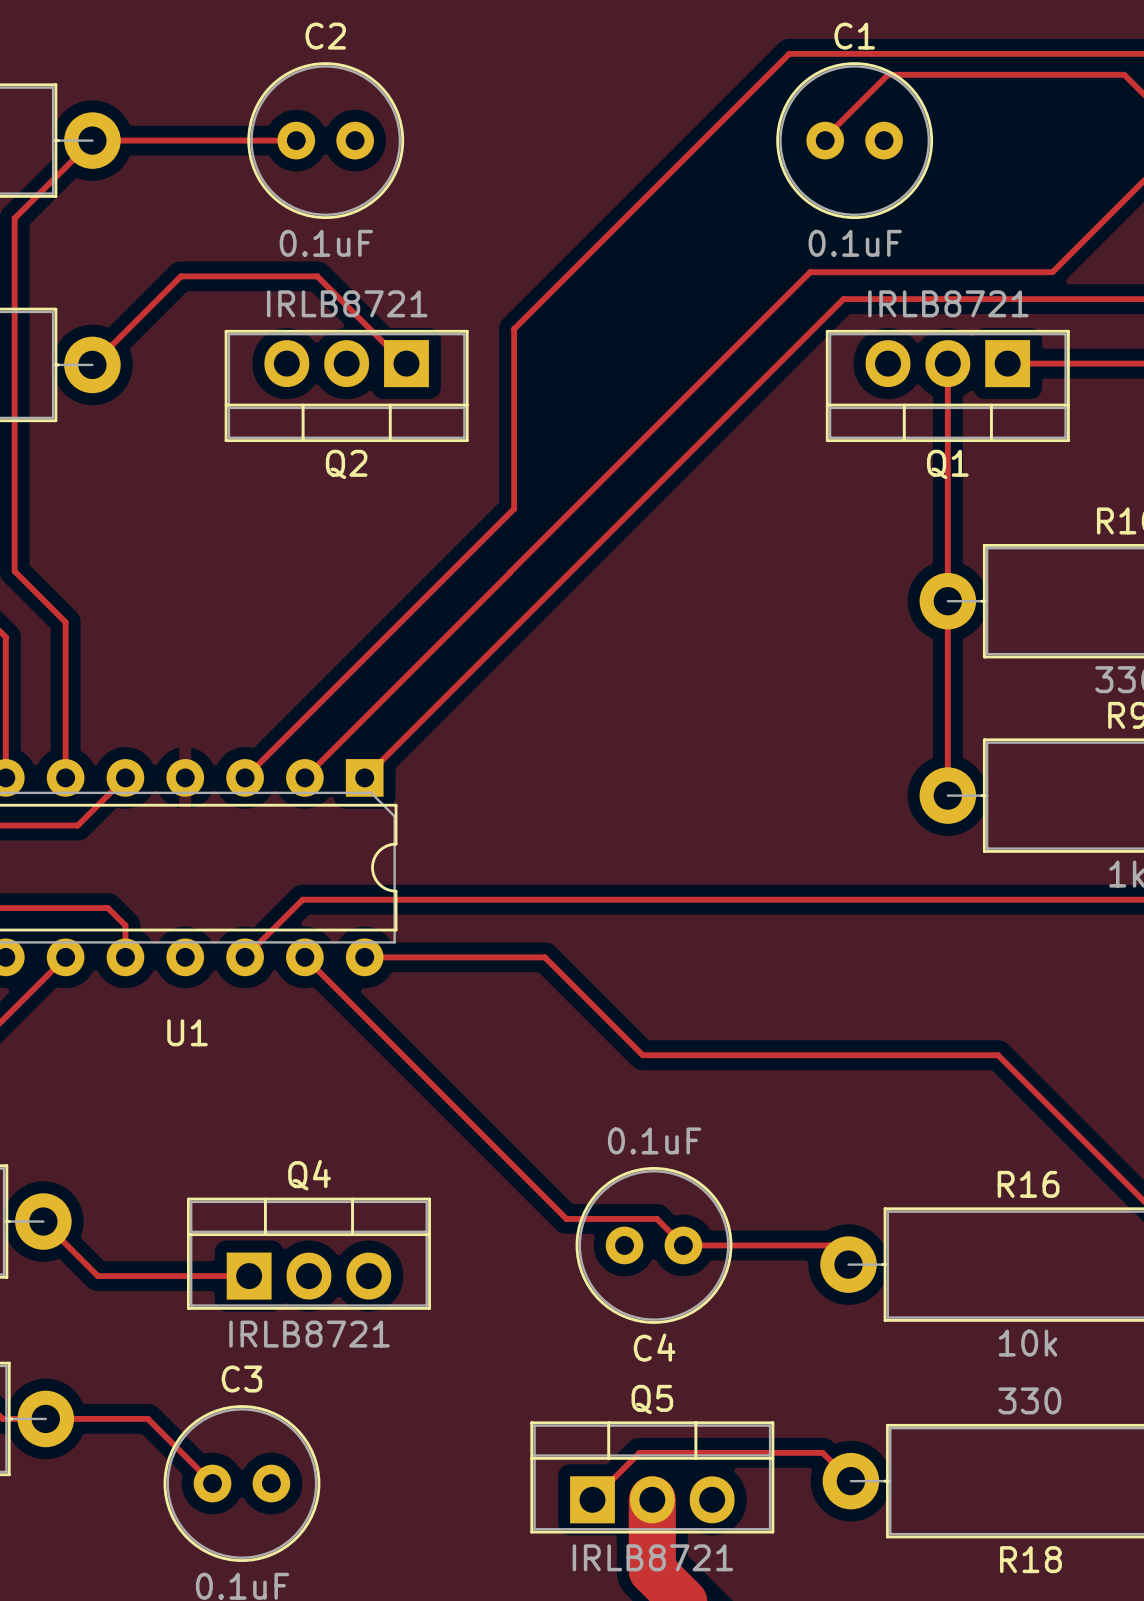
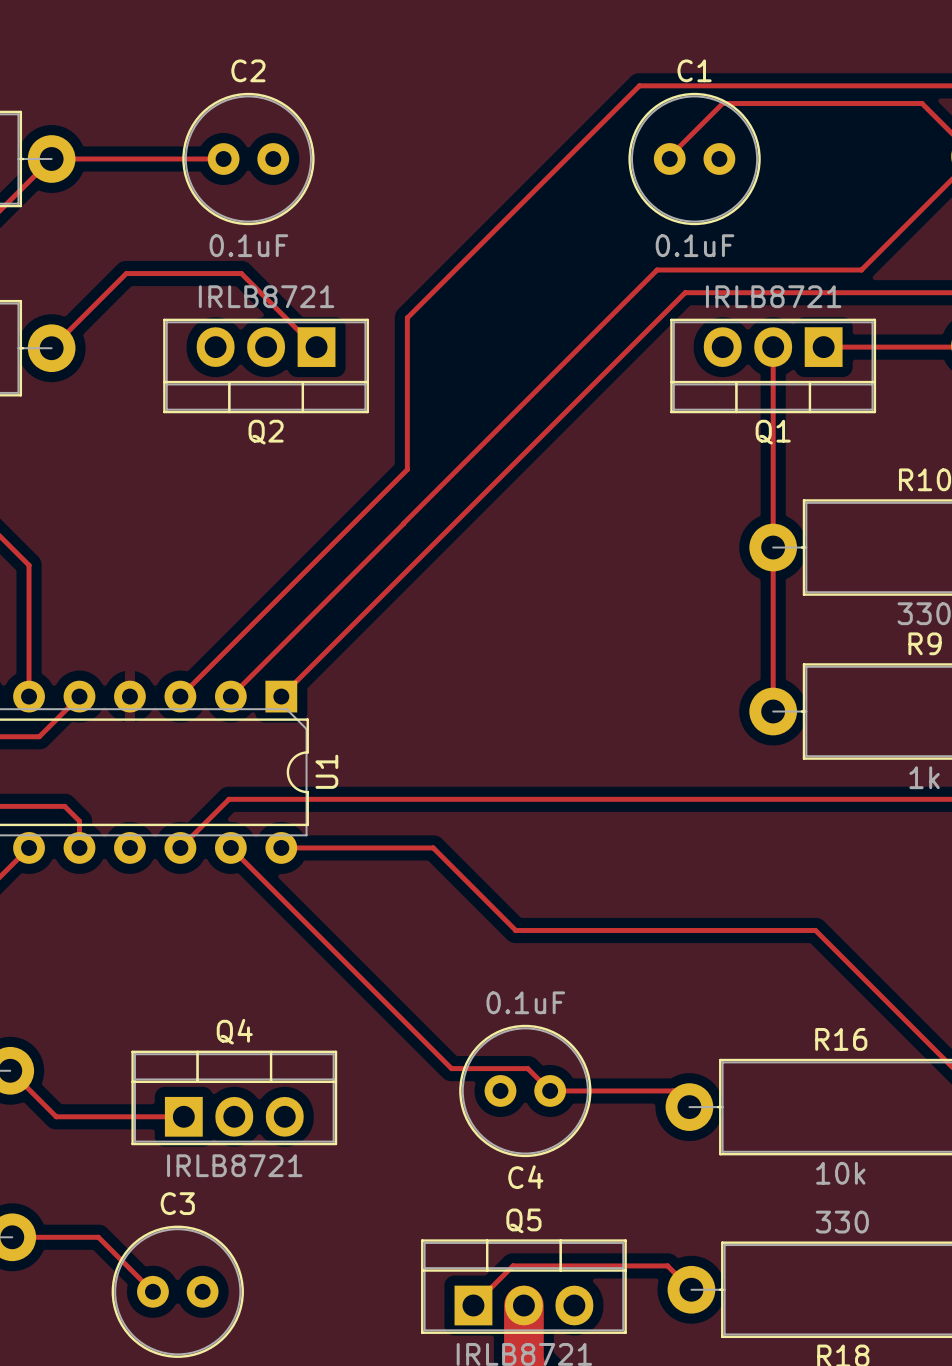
U1 name rotation: 0° (187, 1032) -> 90° counterclockwise (326, 771)
U1 name position: U1 (187, 1032) -> U1 (326, 771)

